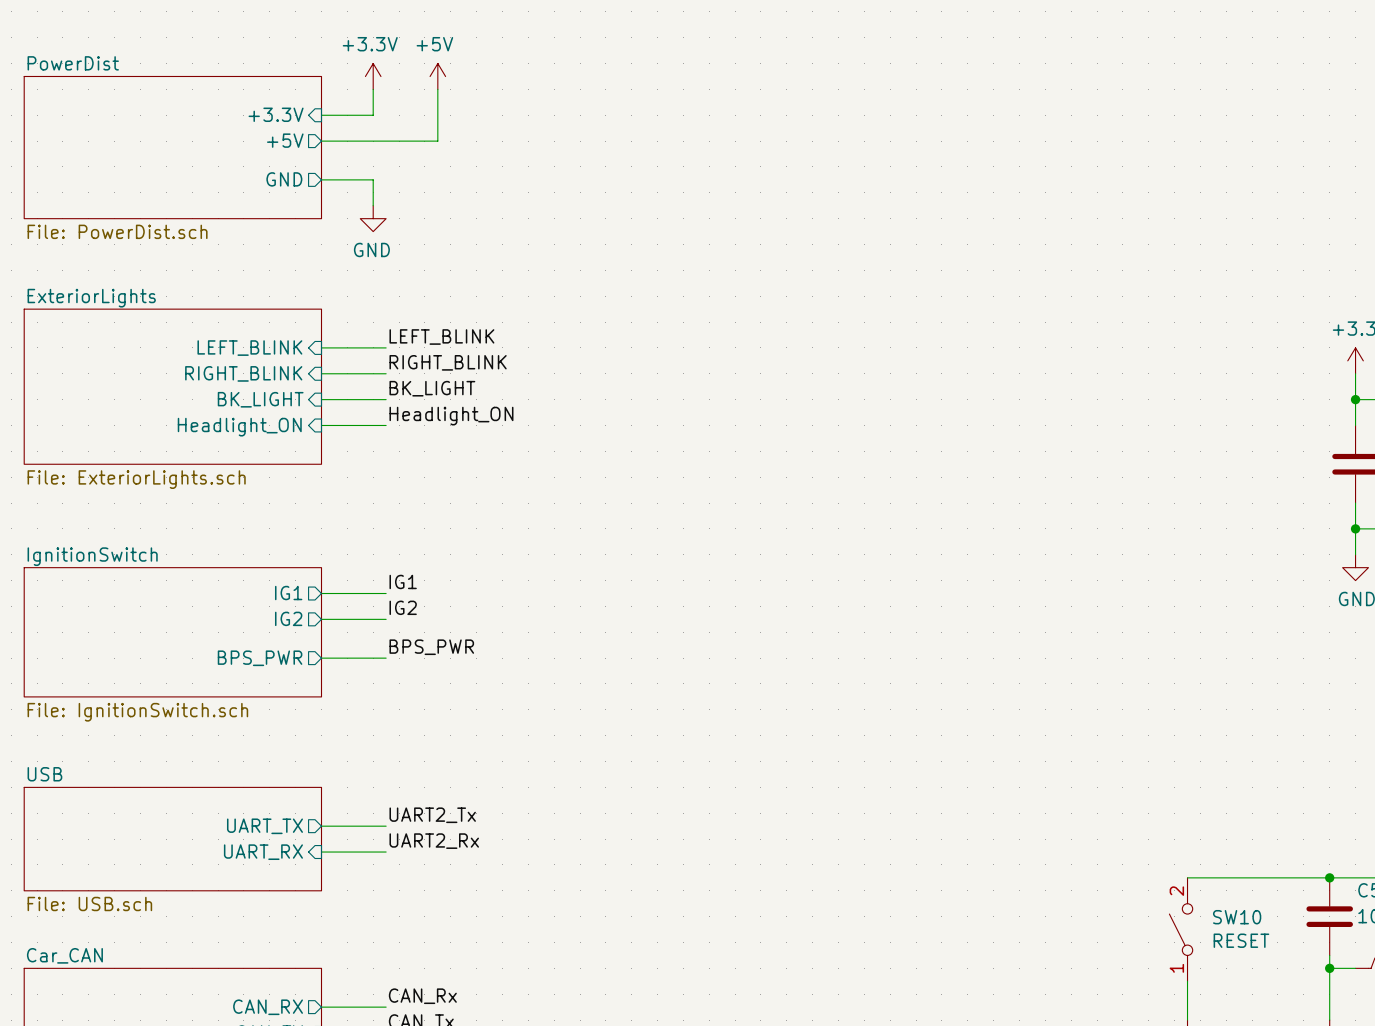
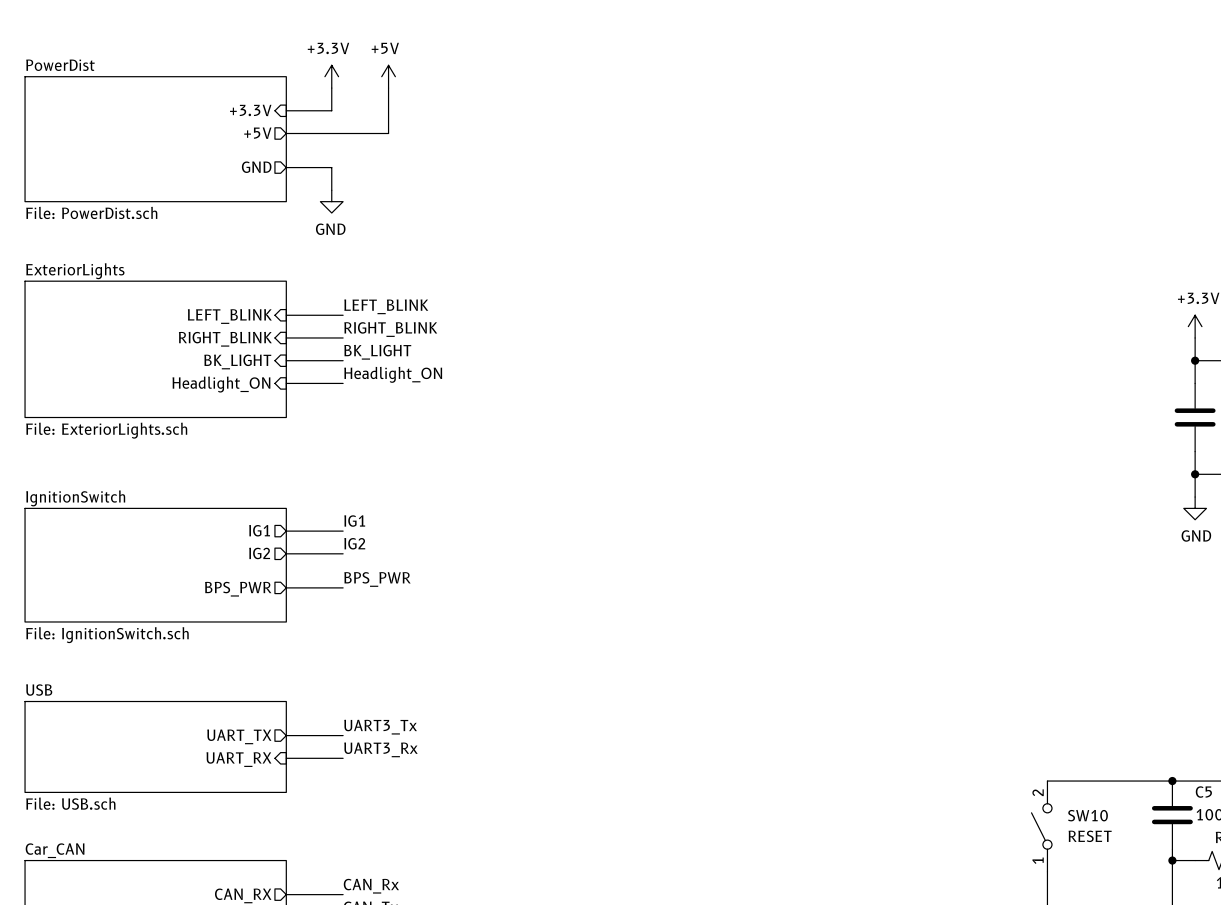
label: UART2_Tx (432, 815) -> UART3_Tx (380, 727)
label: UART2_Rx (434, 841) -> UART3_Rx (380, 749)

